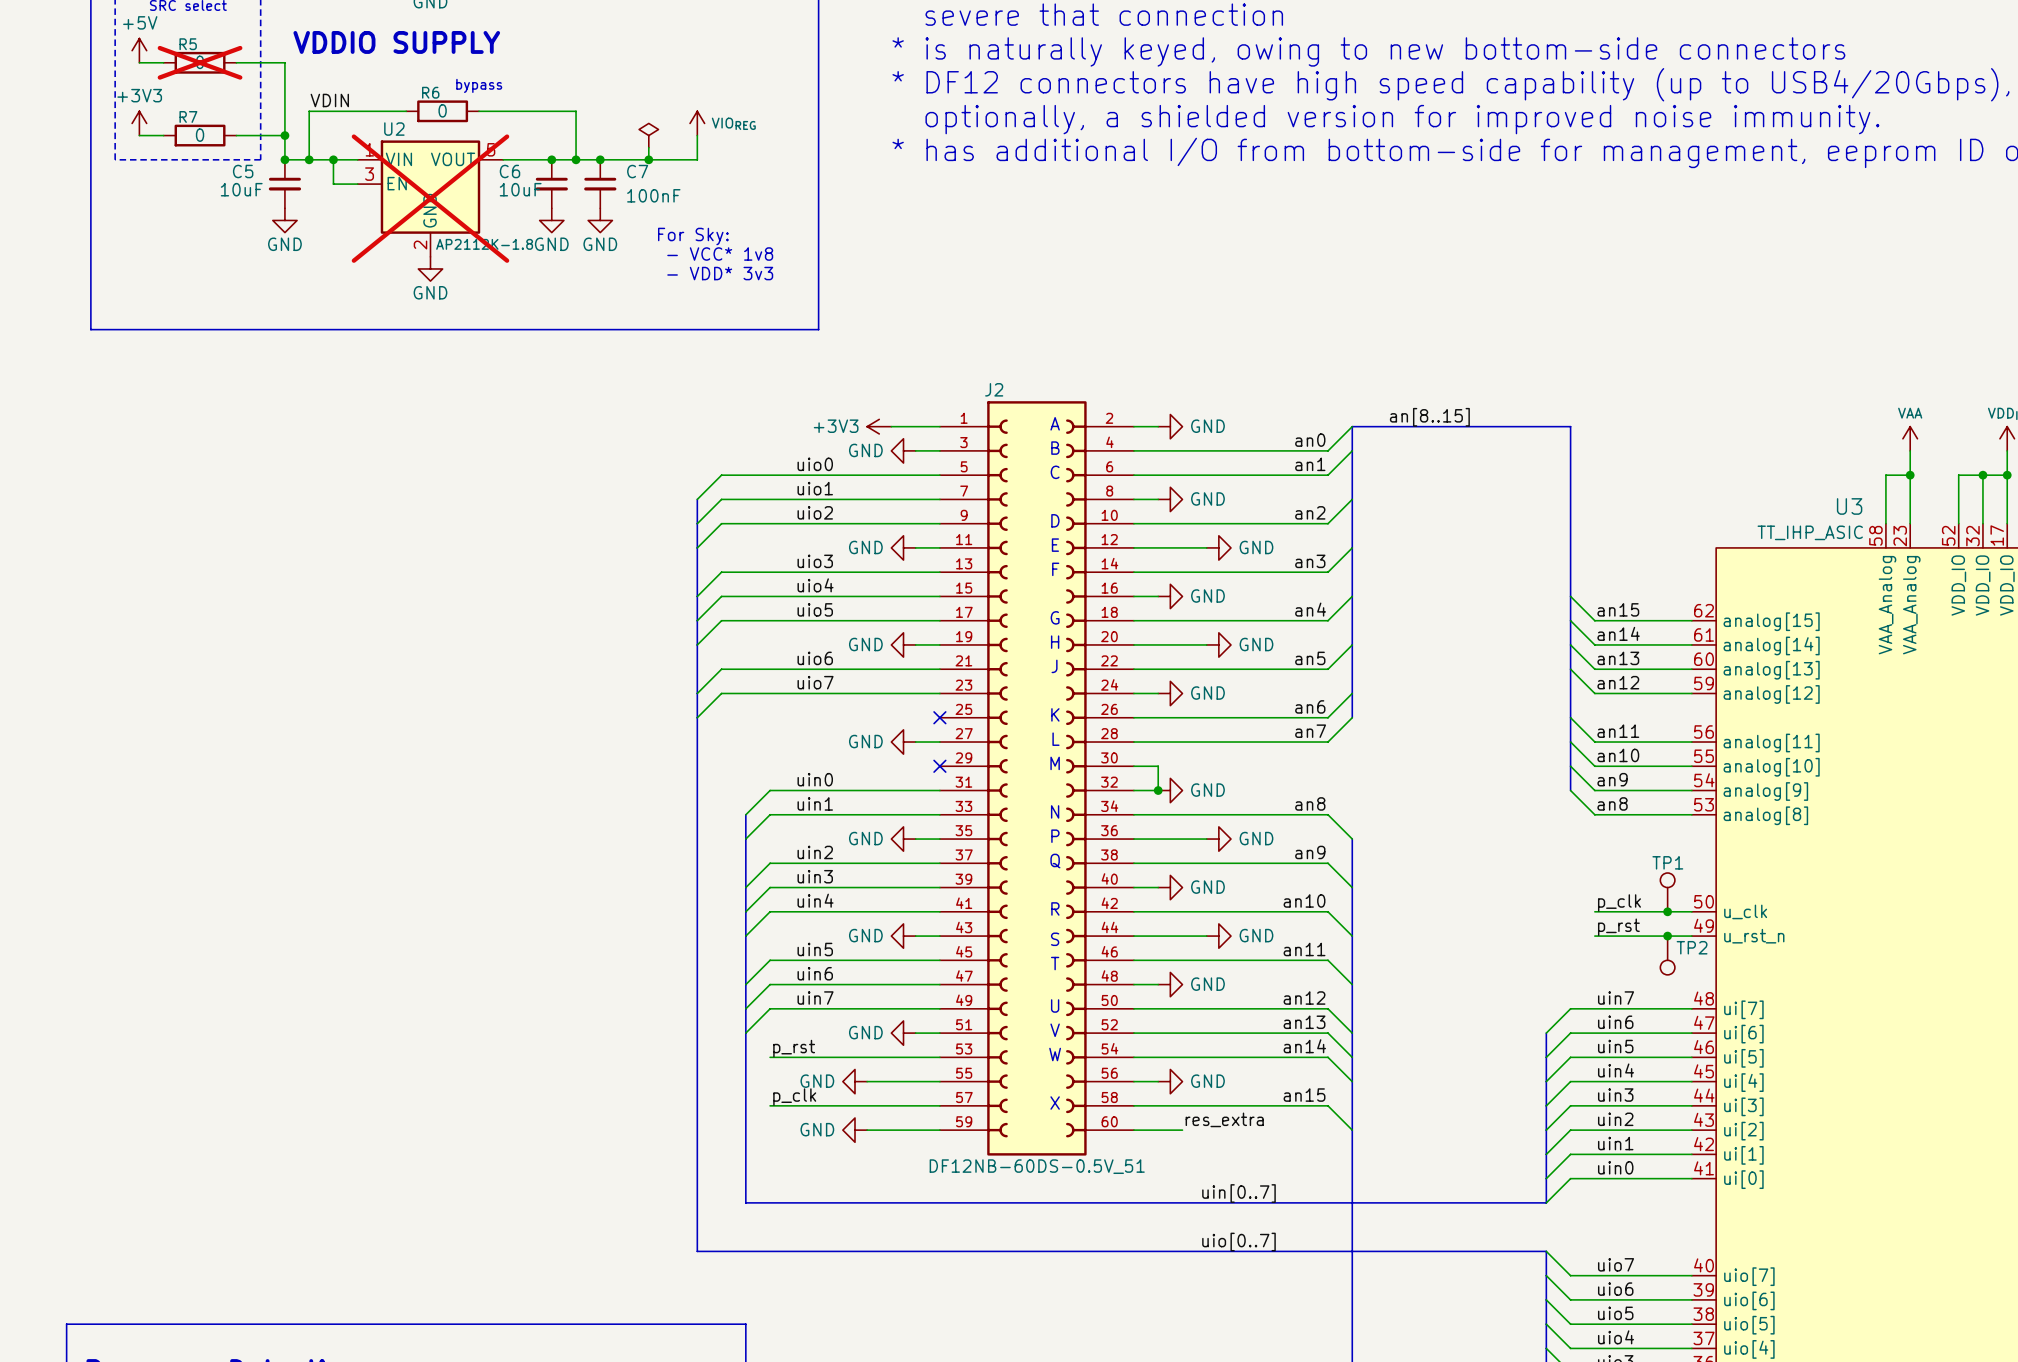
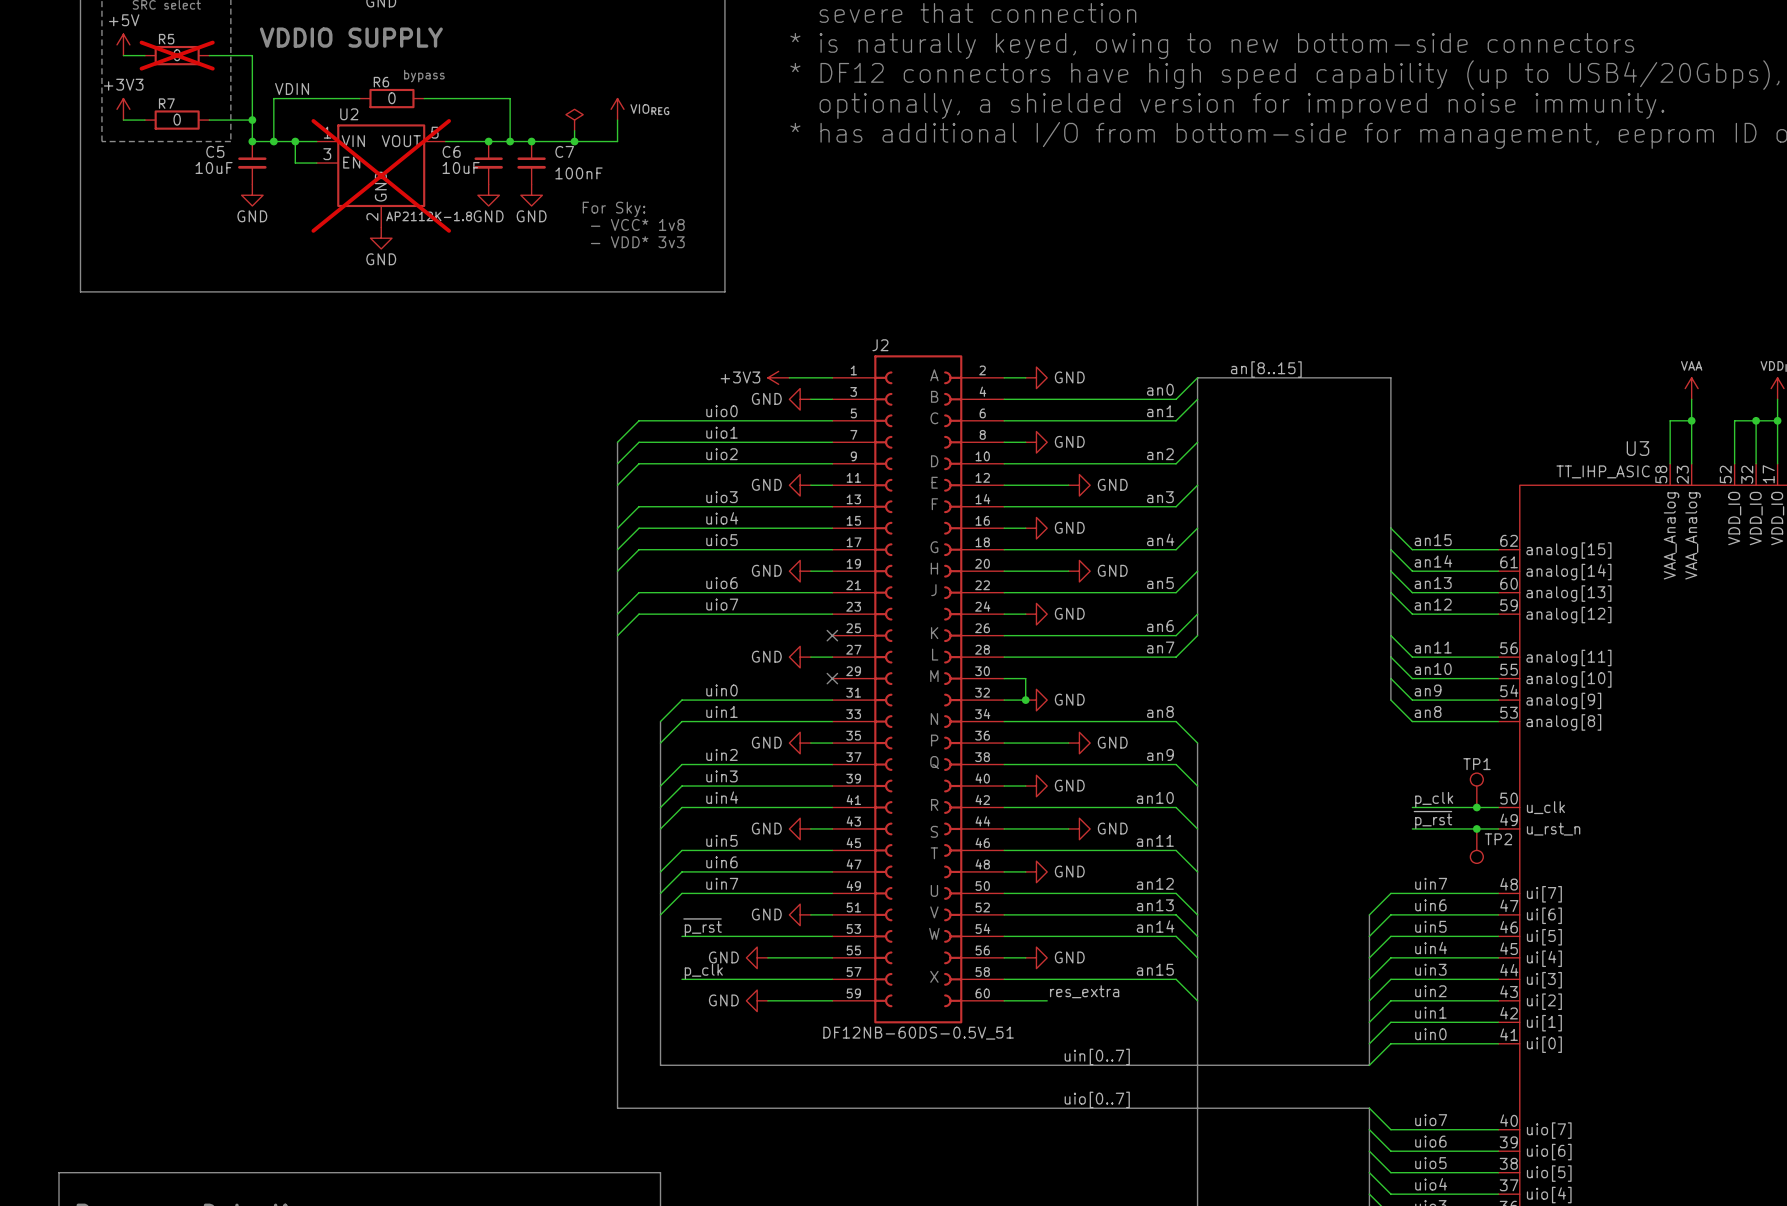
label: p_rst (1618, 927) -> ~{p_rst} (1432, 819)
label: p_rst (794, 1048) -> ~{p_rst} (702, 927)

